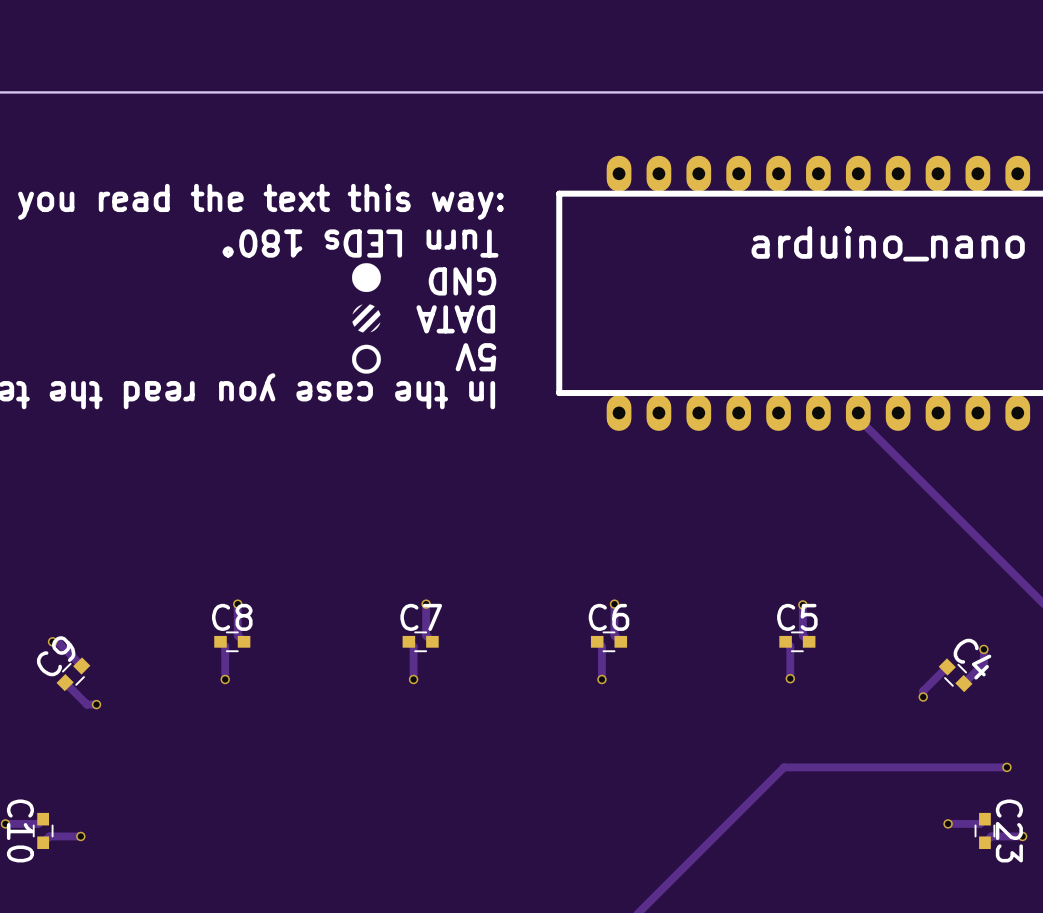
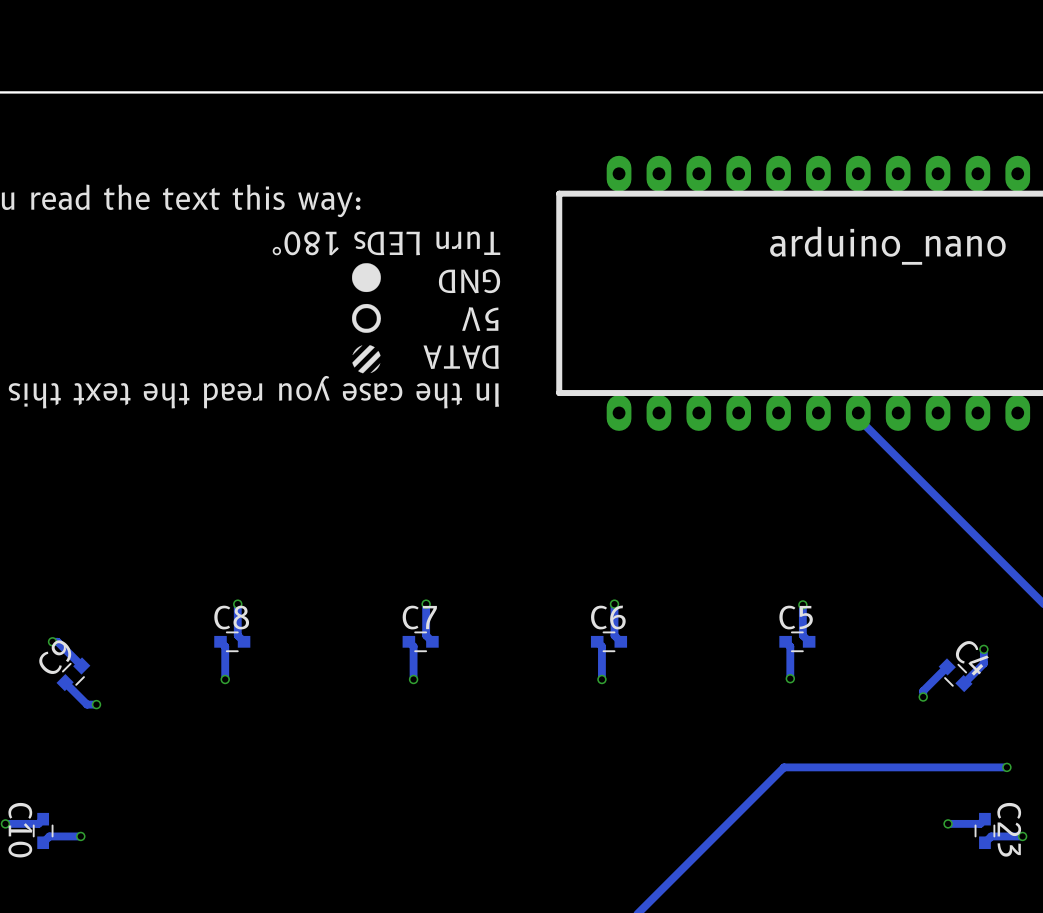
drawing position: (366, 318) -> (366, 359)
text: DATA (455, 319) -> 5V (480, 319)
text: 5V (475, 357) -> DATA (461, 357)
drawing position: (366, 359) -> (366, 318)

